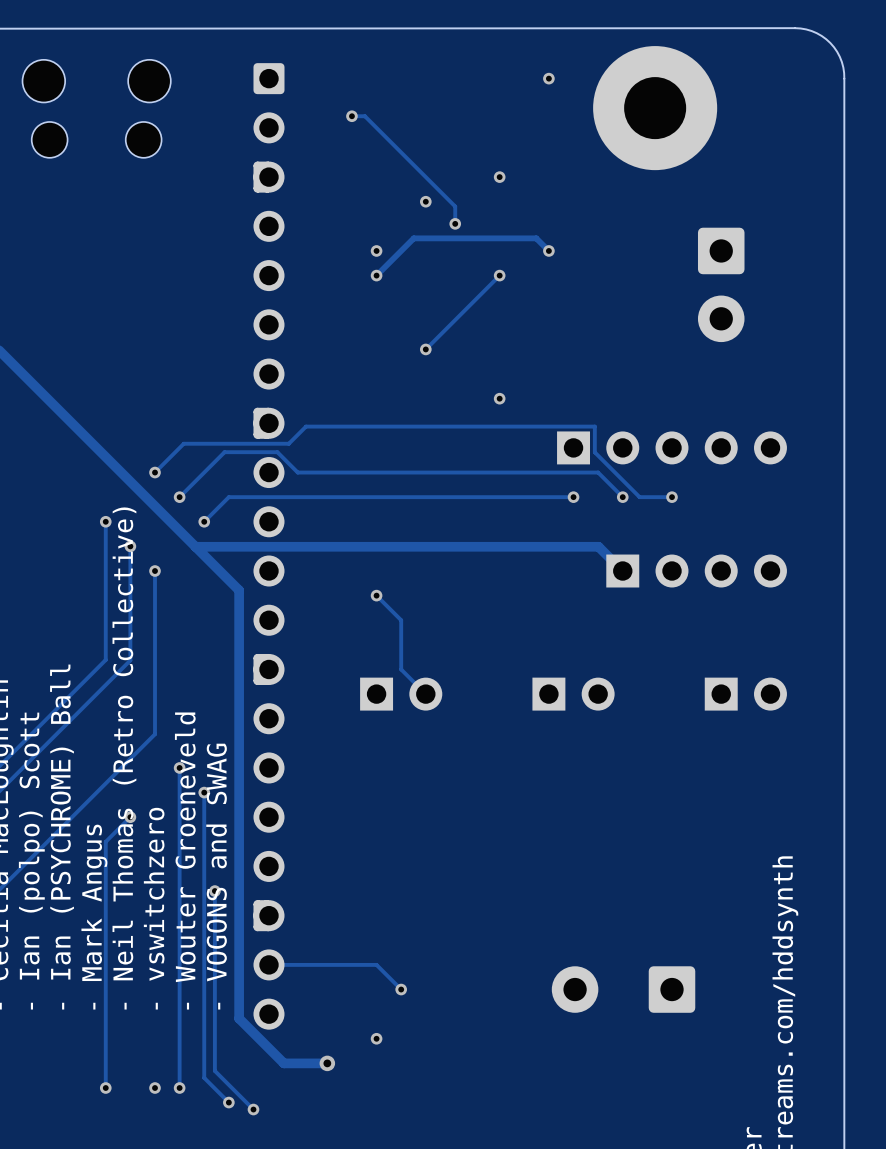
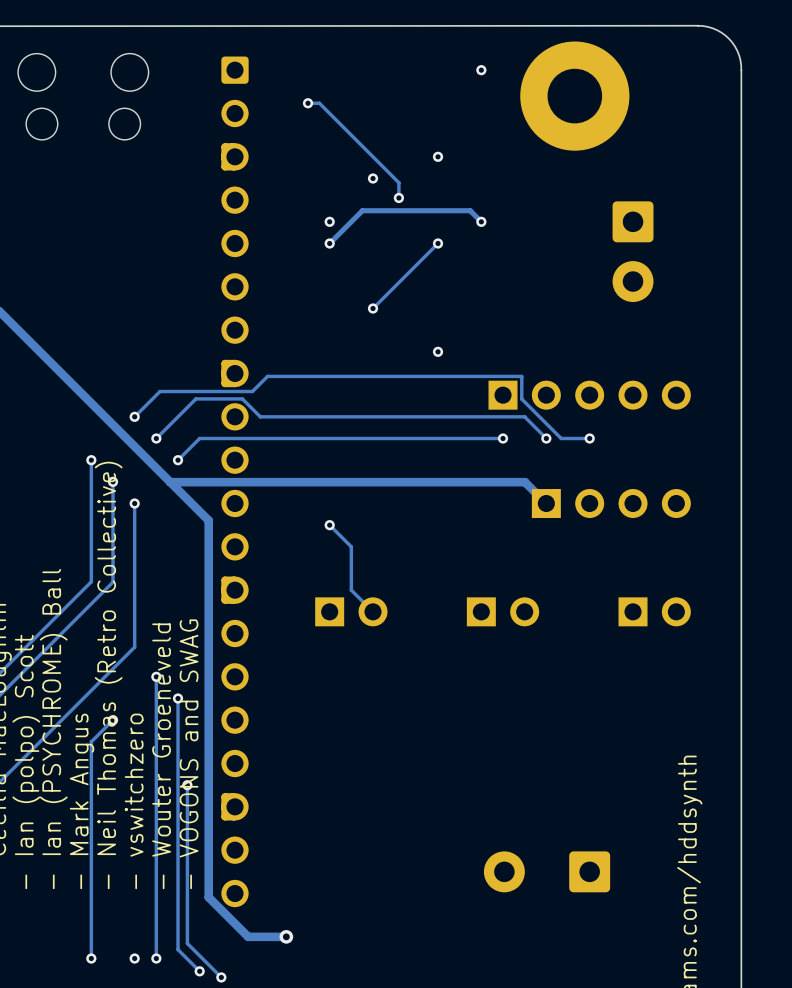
track: (268, 964) (376, 964) (401, 989) -> none
via: (401, 989) -> none
via: (376, 1038) -> none

